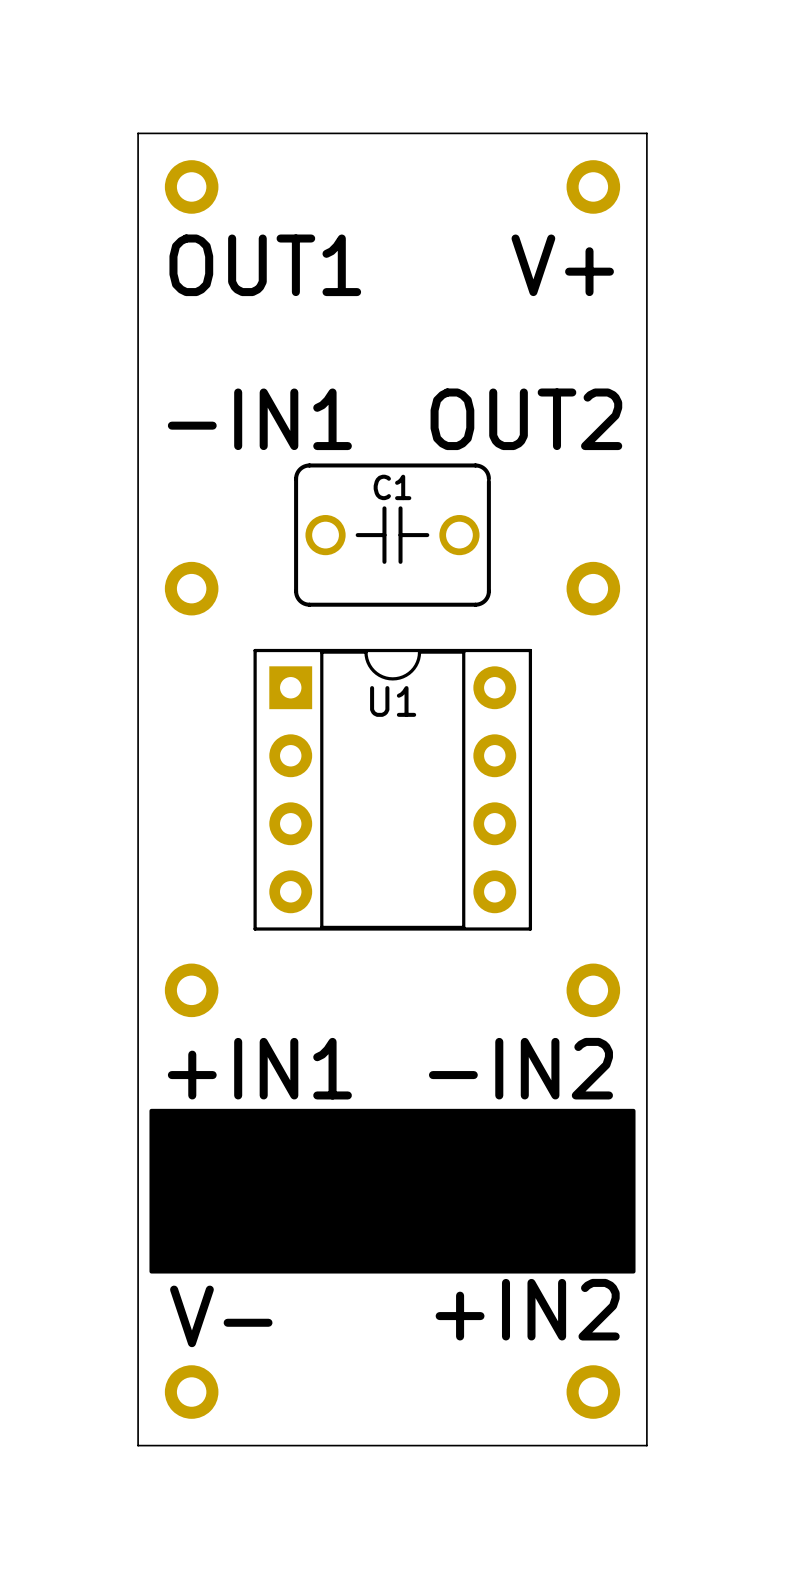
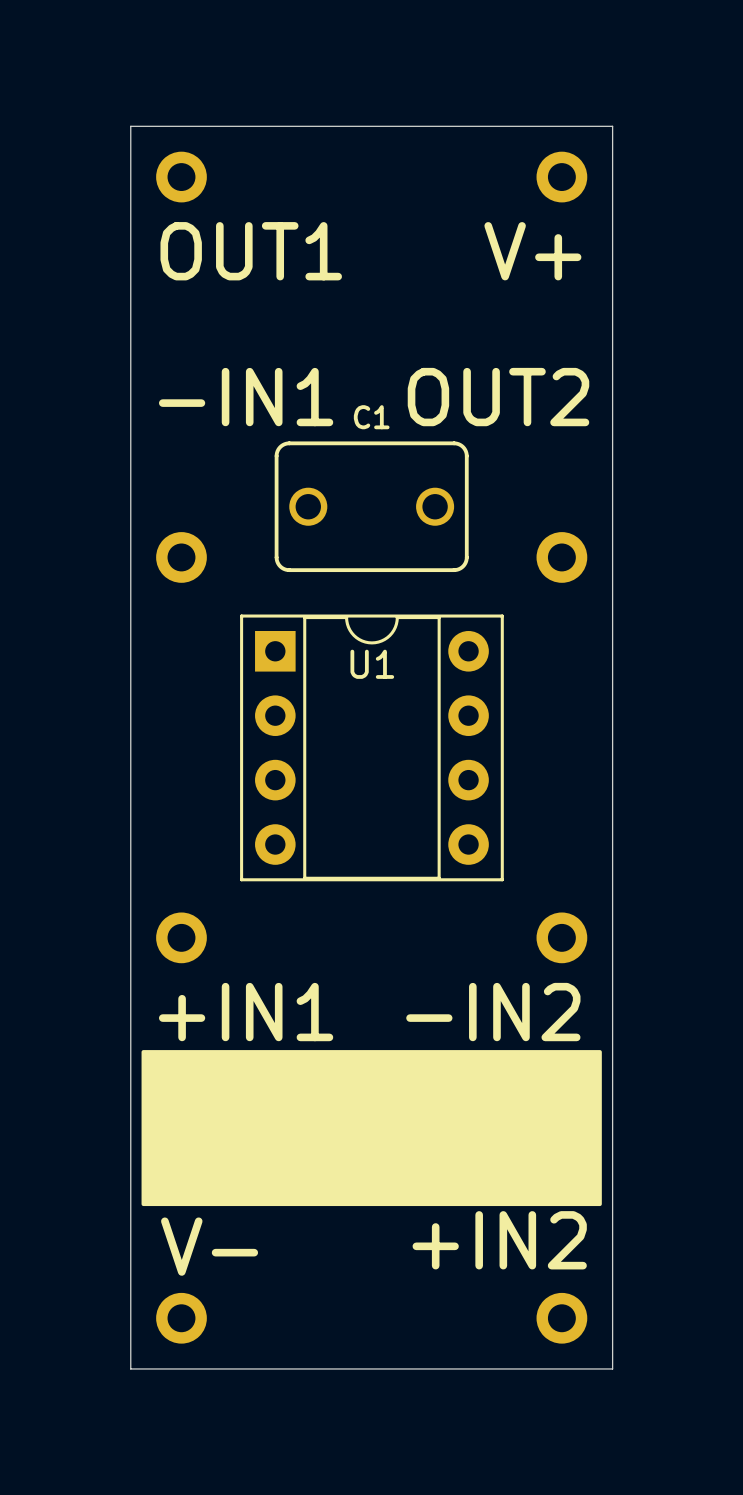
C1 footprint: [294, 463, 491, 607] -> [274, 441, 469, 573]

